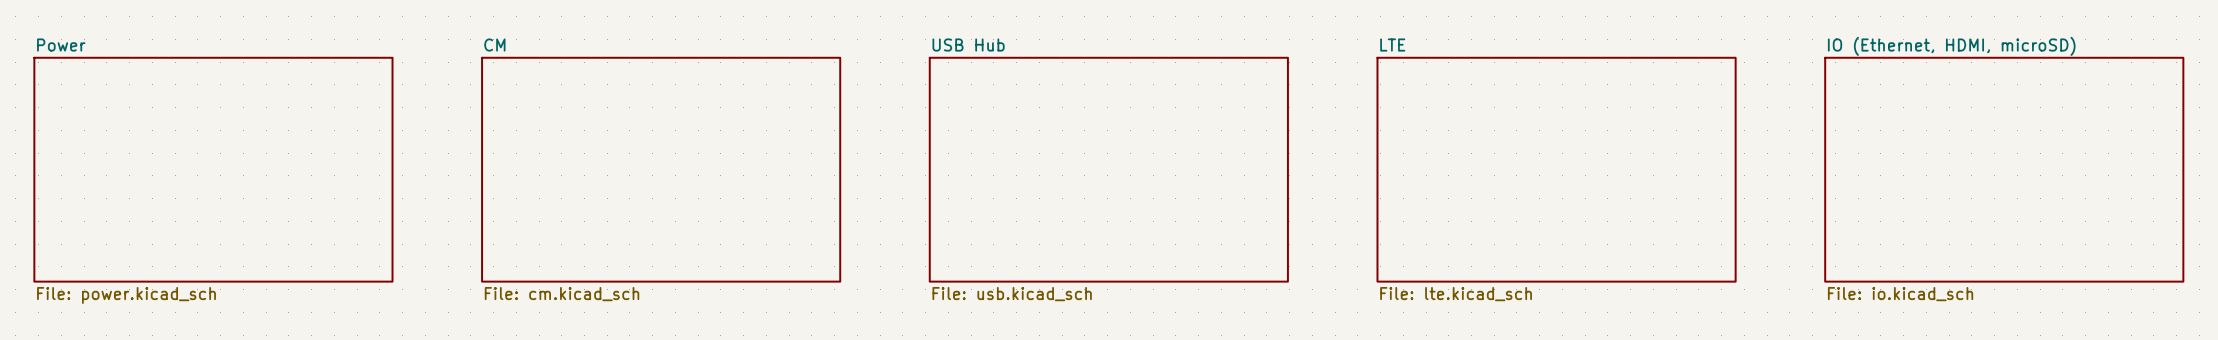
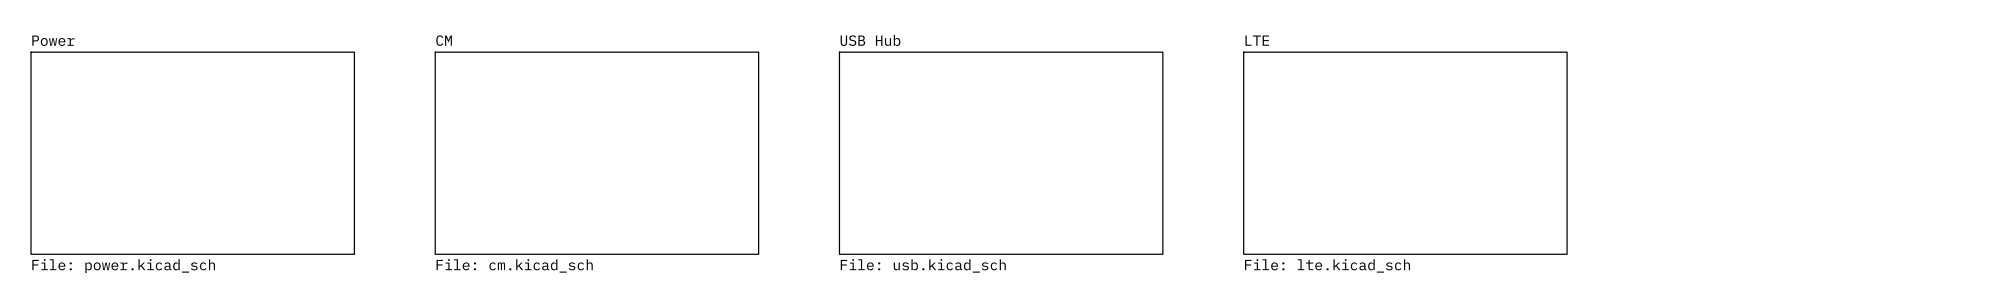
sheet IO (Ethernet, HDMI, microSD): File: io.kicad_sch (2004, 169) -> none

